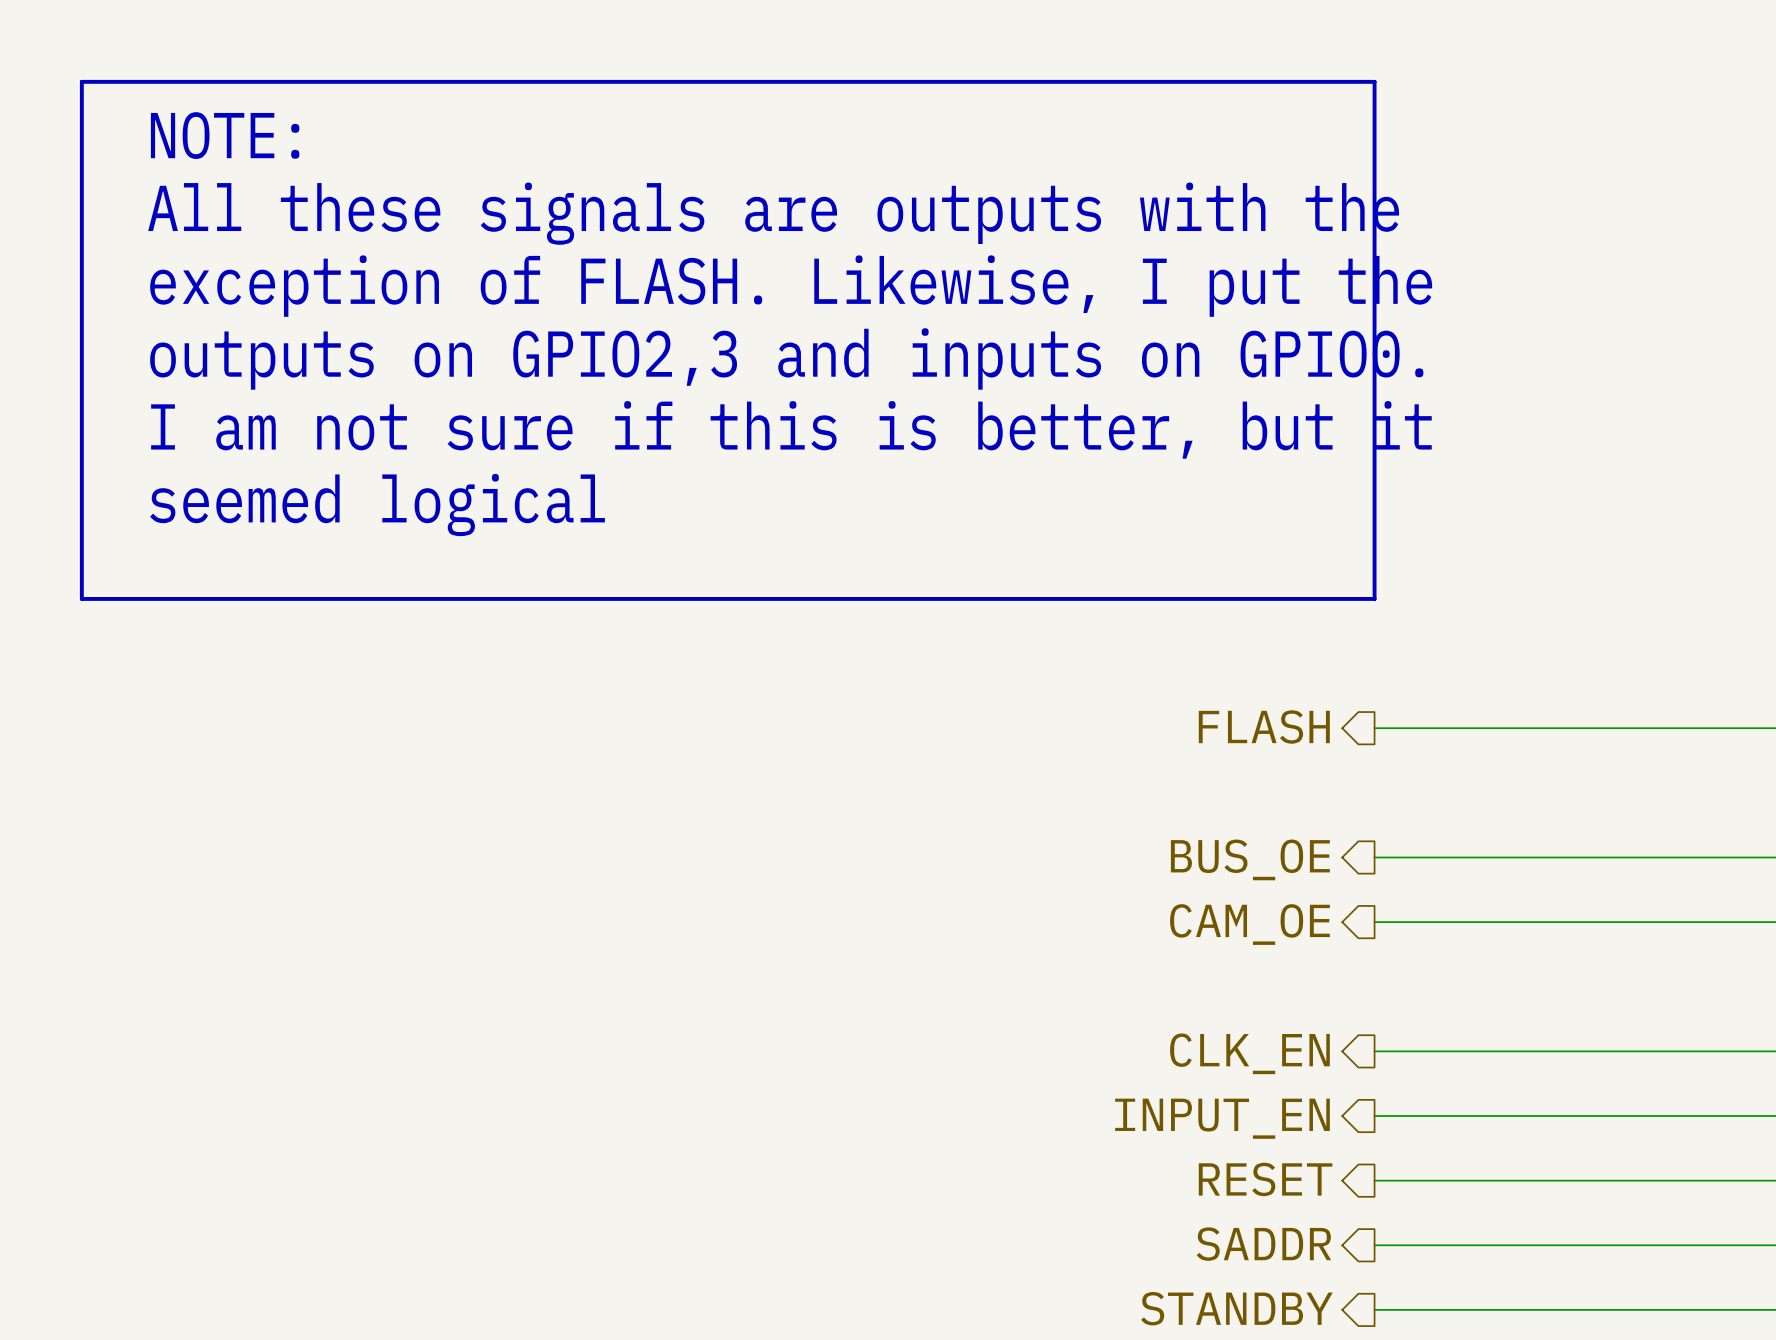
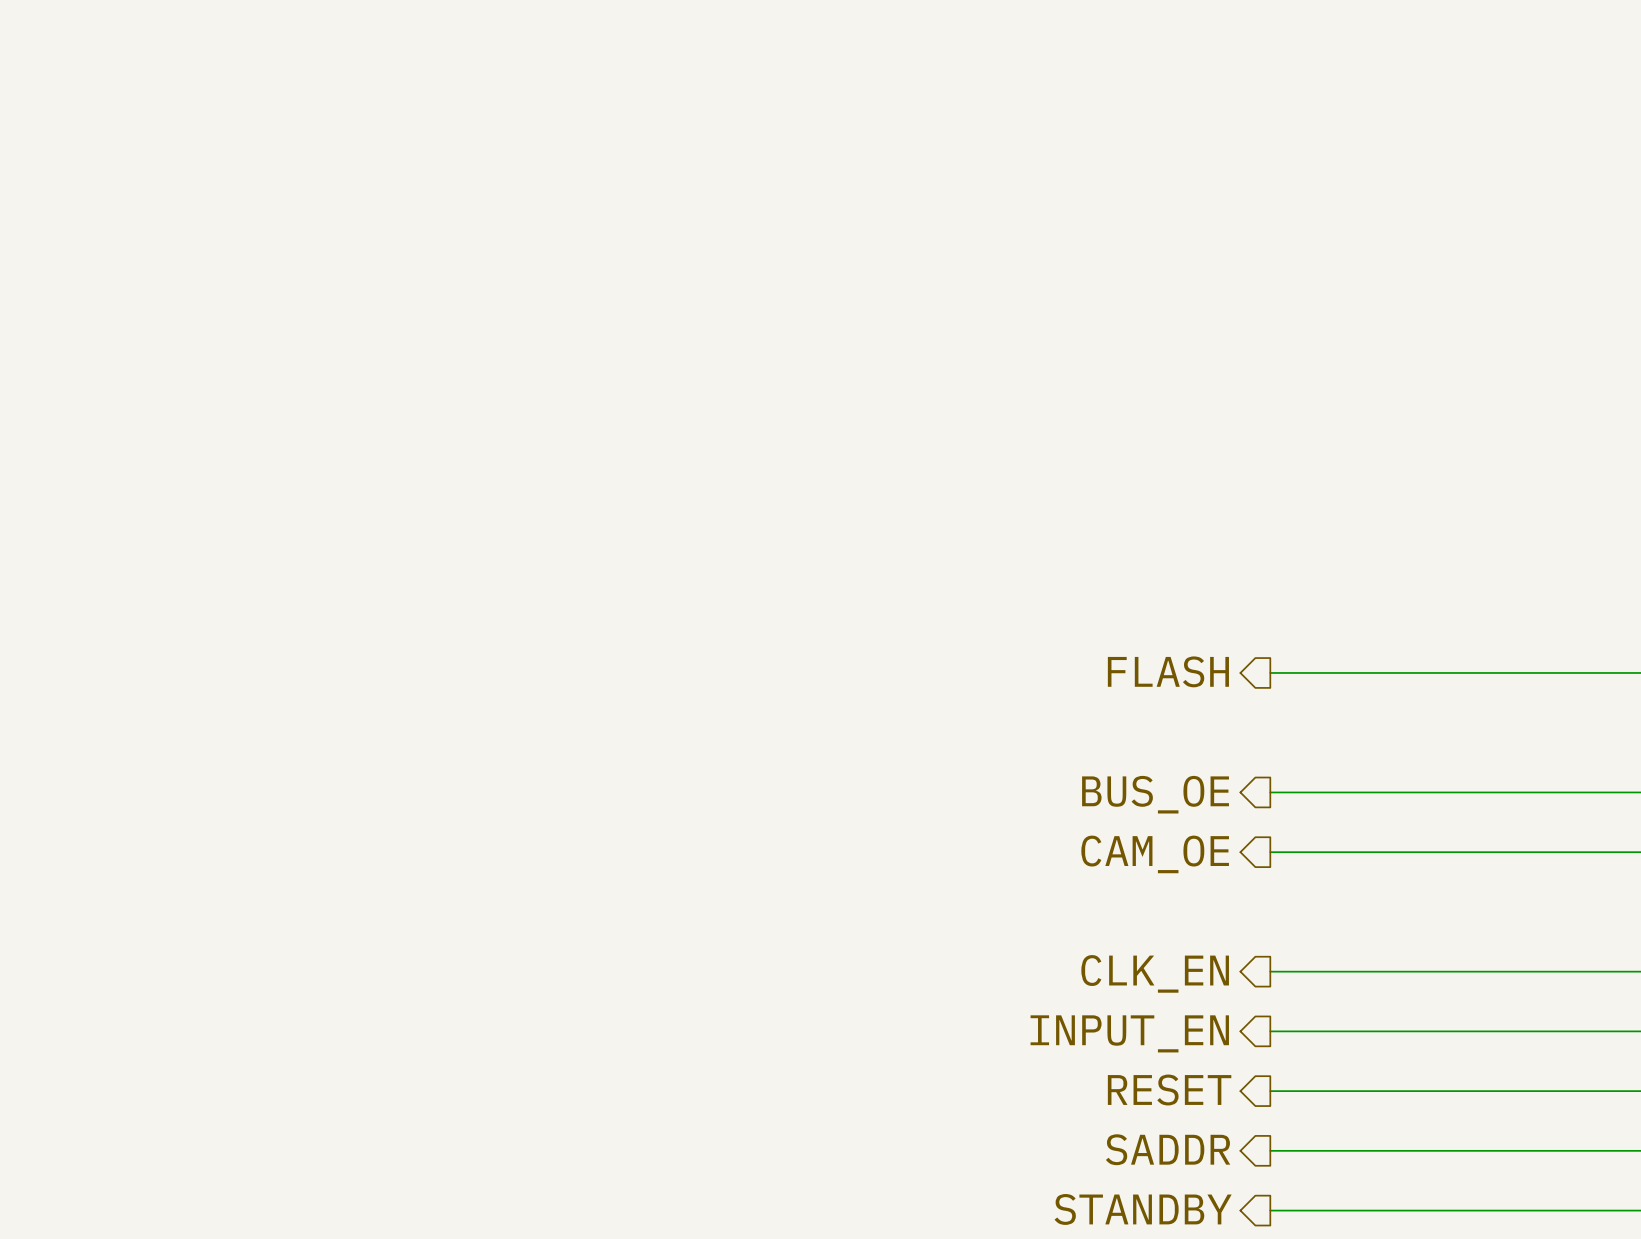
line: (81, 81) (1374, 81) (1374, 598) (81, 598) (81, 81) -> none
text: NOTE: (225, 135) -> none
text: All these signals are outputs with the (773, 213) -> none
text: exception of FLASH. Likewise, I put the (791, 286) -> none
text: outputs on GPIO2,3 and inputs on GPIO0. (786, 358) -> none
text: I am not sure if this is better, but it (791, 429) -> none
text: seemed logical (377, 505) -> none

